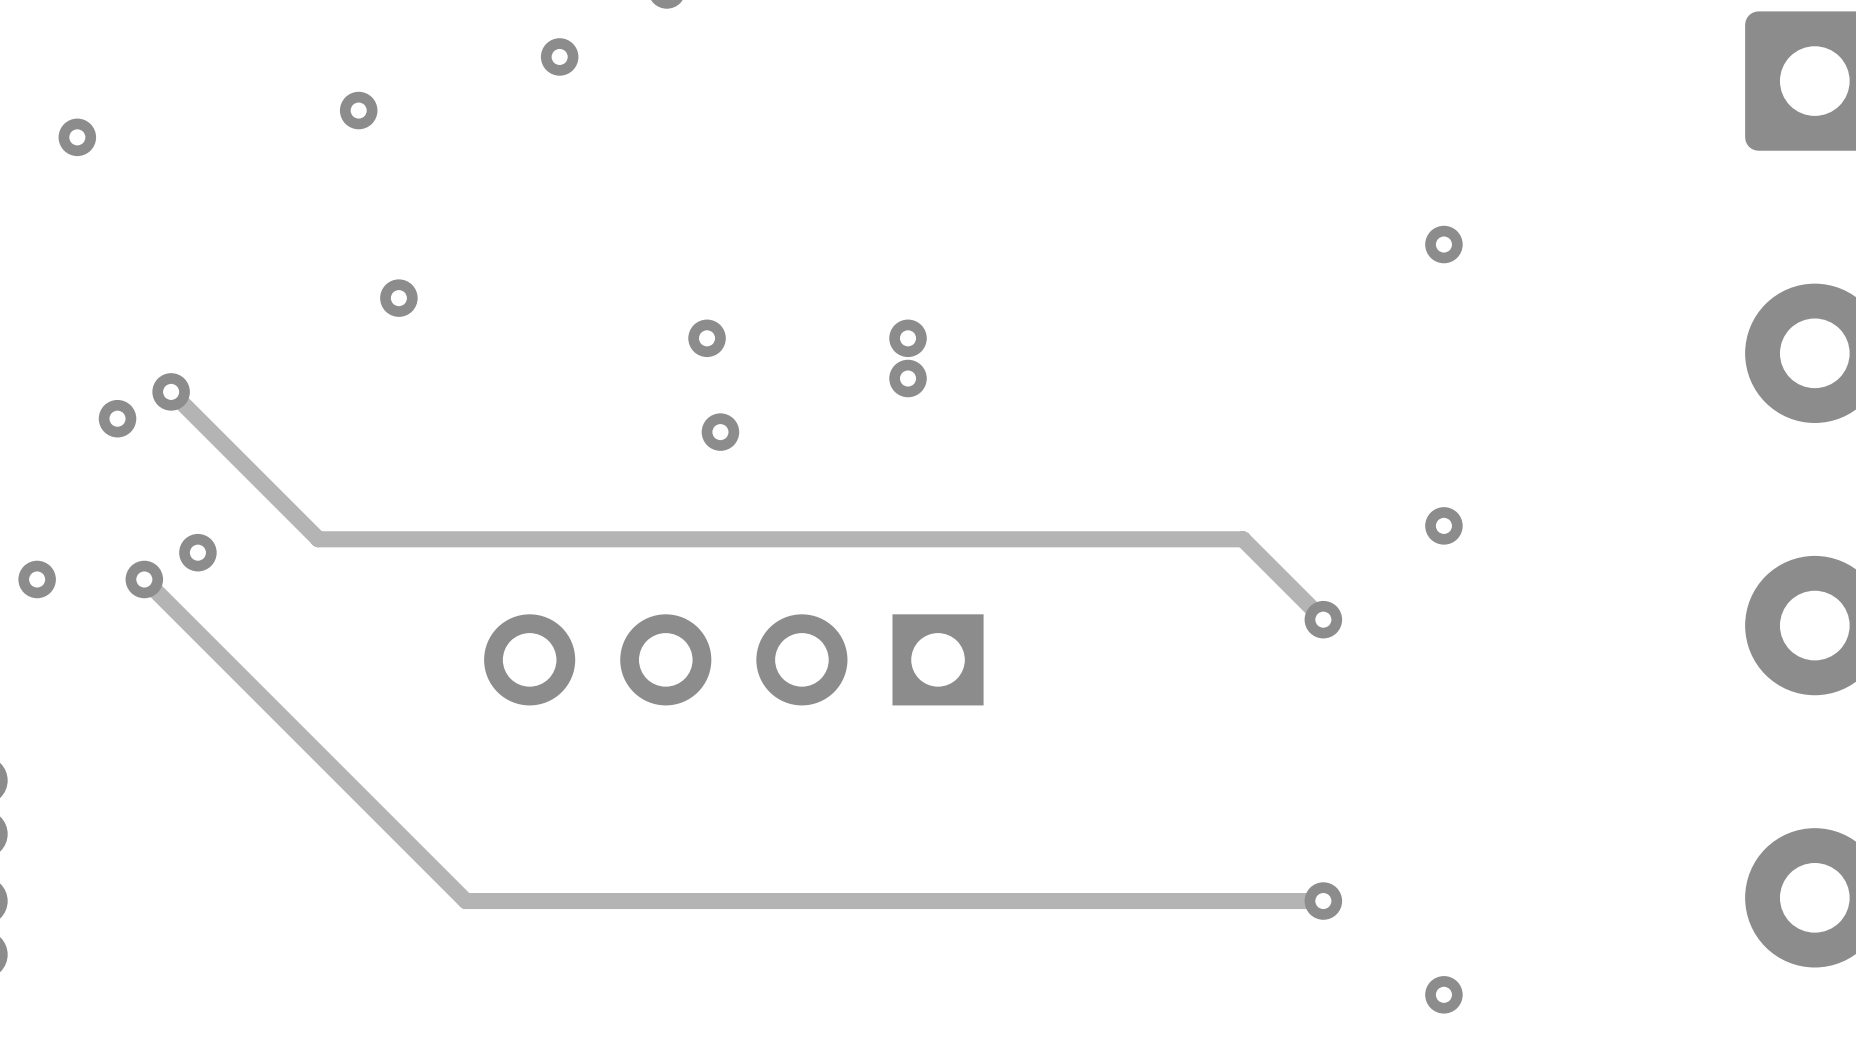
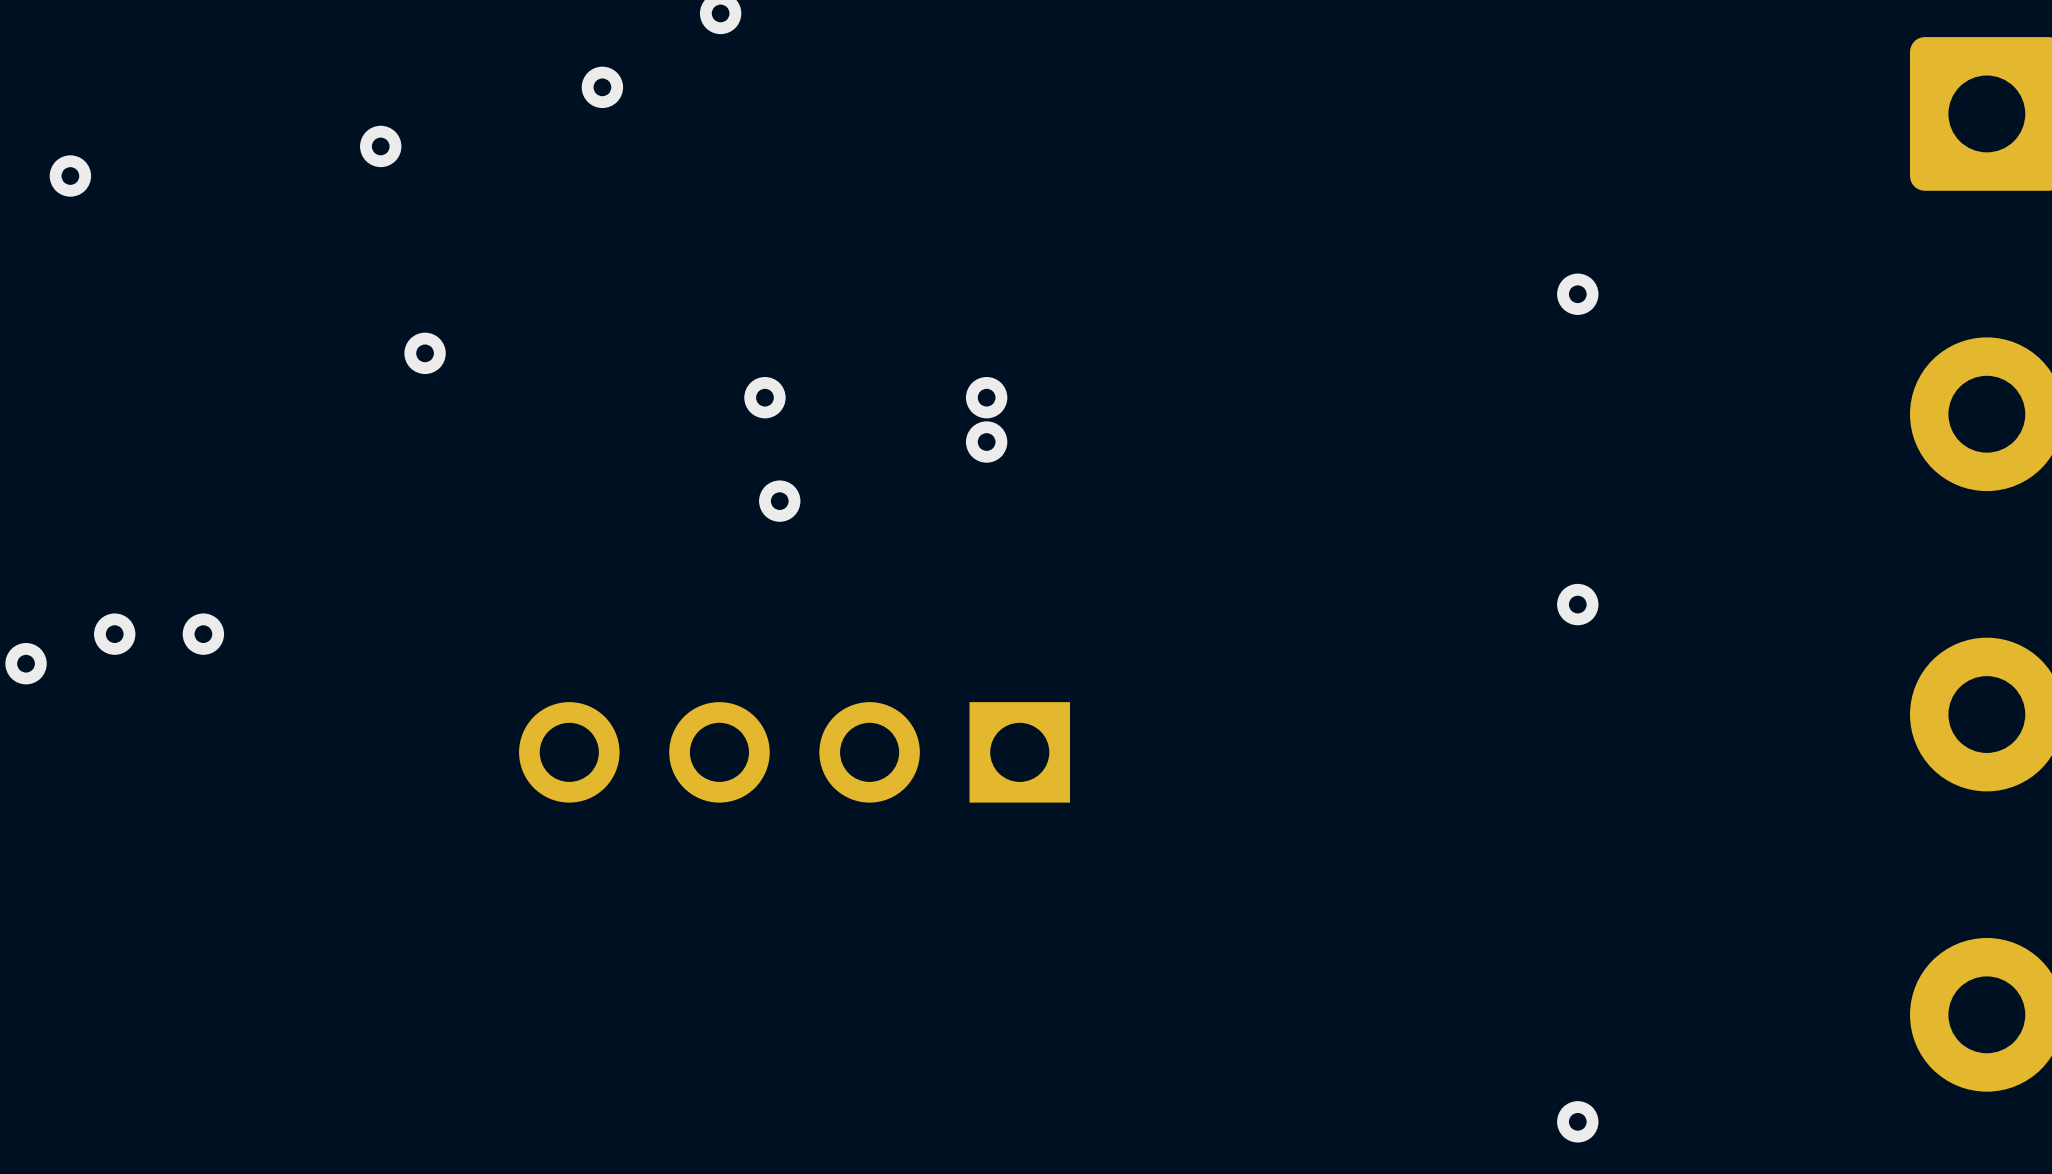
track: (171, 391) (318, 539) (1242, 539) (1323, 619) -> none
via: (171, 391) -> none
via: (117, 418) -> none
track: (144, 579) (465, 901) (1323, 901) -> none
via position: (144, 579) -> (114, 634)
via: (1323, 619) -> none
via: (1323, 901) -> none

